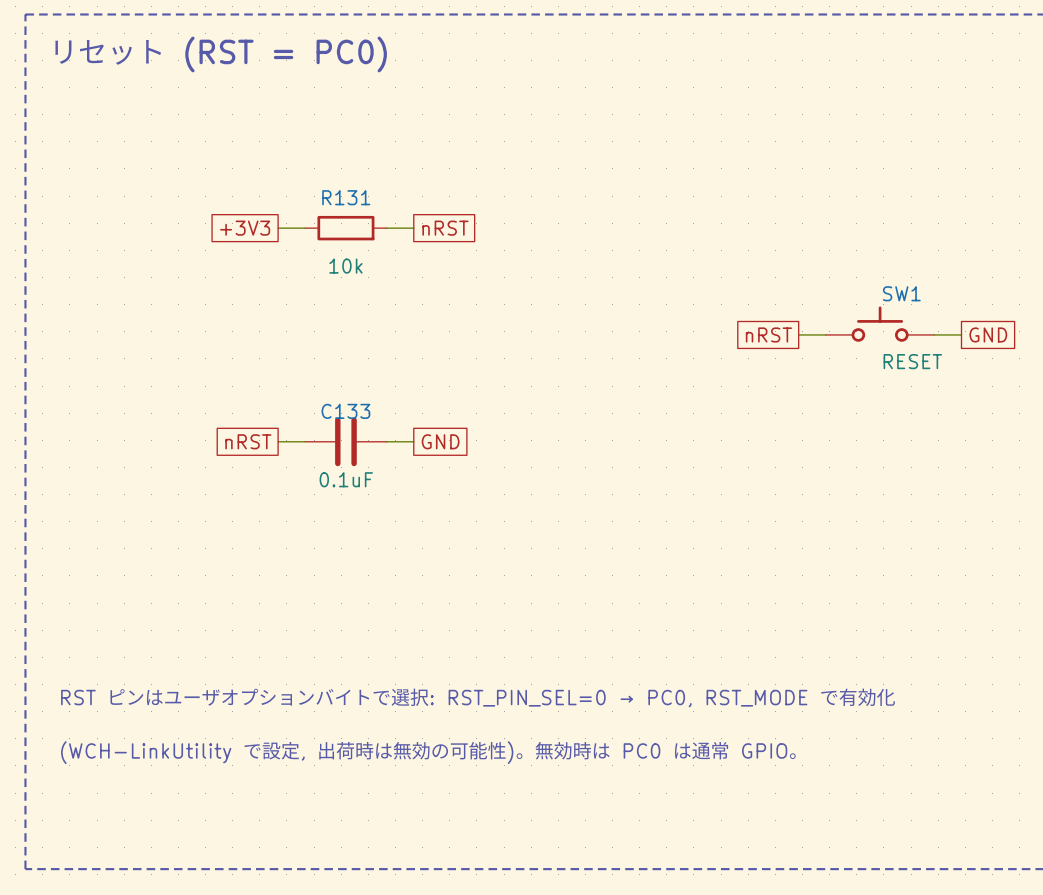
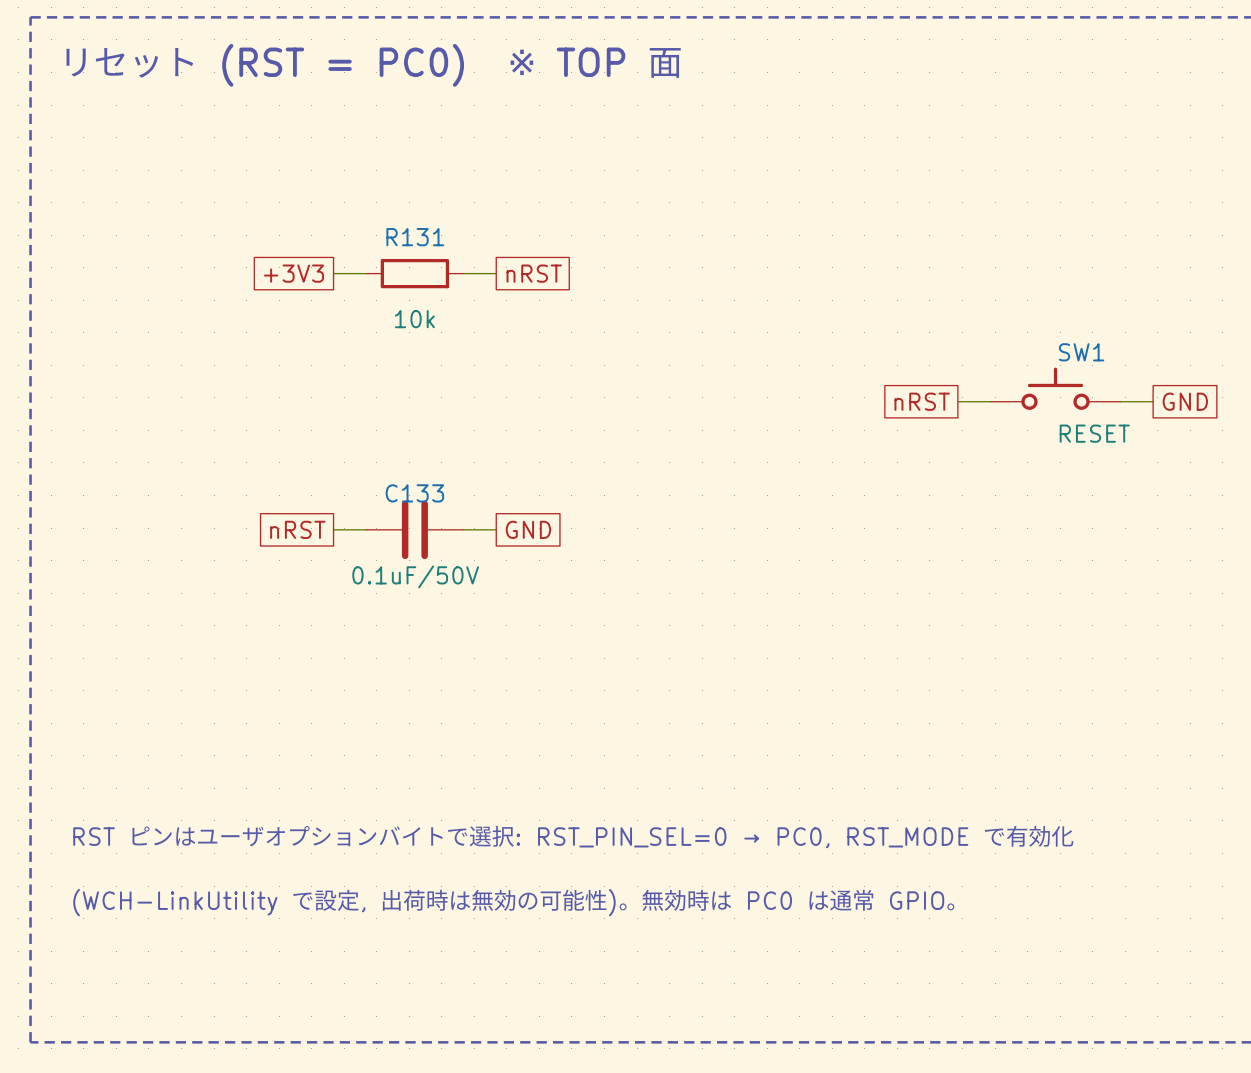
text: リセット (RST = PC0) (220, 54) -> リセット (RST = PC0) ※ TOP 面 (373, 65)
C133 value: 0.1uF (346, 479) -> 0.1uF/50V (415, 576)

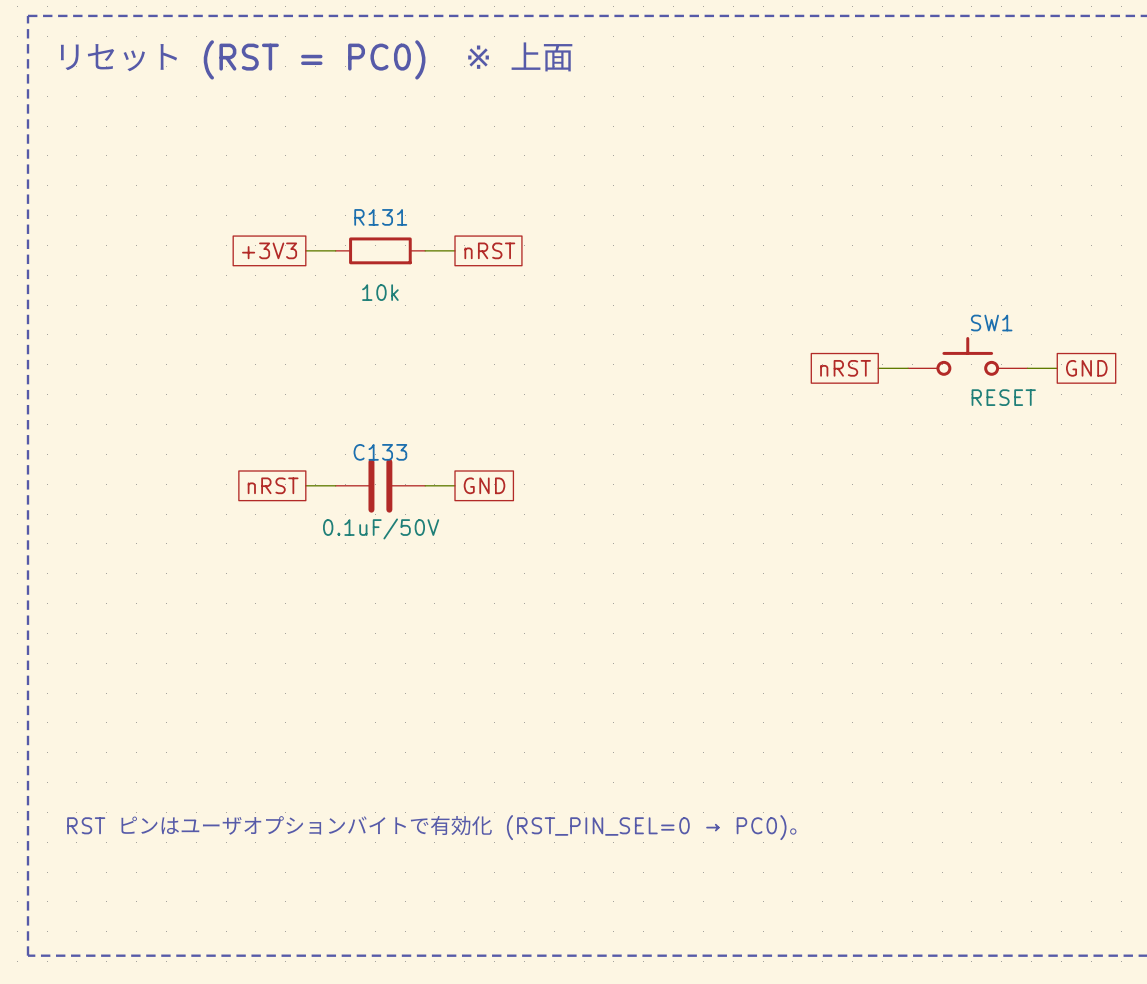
text: リセット (RST = PC0) ※ TOP 面 (373, 65) -> リセット (RST = PC0) ※ 上面 (316, 59)
text: RST ピンはユーザオプションバイトで選択: RST_PIN_SEL=0 → PC0, RST_MODE で有効化 (573, 836) -> none
text: (WCH-LinkUtility で設定, 出荷時は無効の可能性)。無効時は PC0 は通常 GPIO。 (514, 902) -> RST ピンはユーザオプションバイトで有効化 (RST_PIN_SEL=0 → PC0)。 (432, 827)

